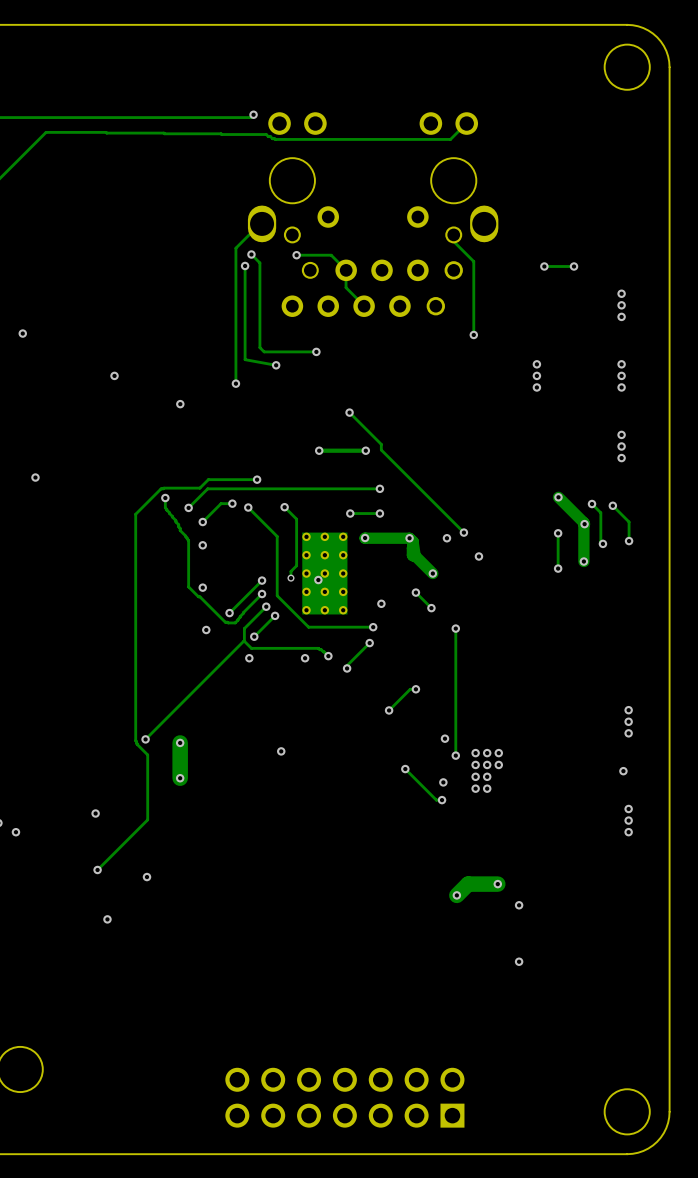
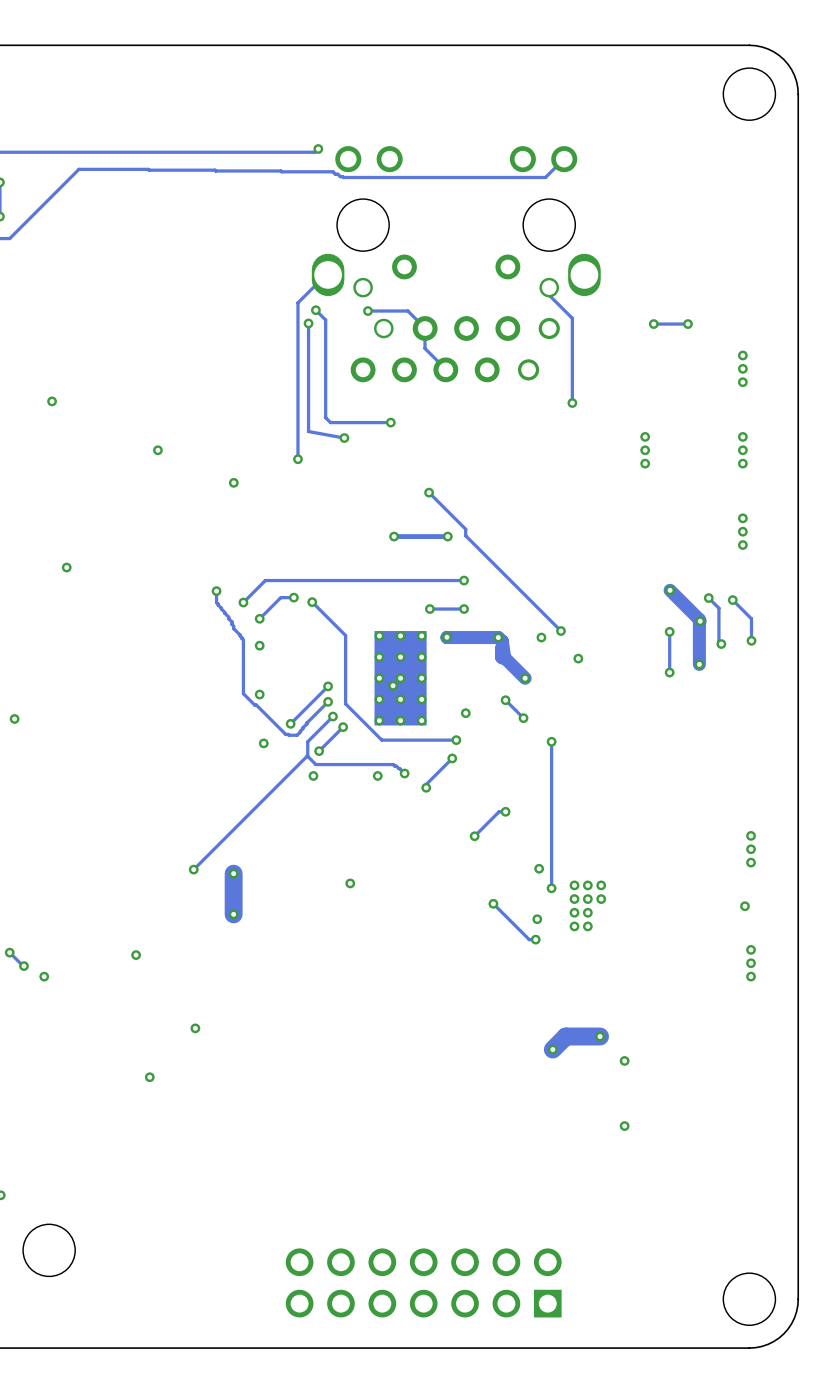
track: (257, 479) (208, 479) (199, 488) (161, 488) (135, 514) (135, 740) (147, 754) (147, 819) (97, 869) -> none
via: (257, 479) -> none
track: (284, 507) (296, 519) (296, 565) (290, 571) (290, 577) -> none
via: (284, 507) -> none
via: (290, 578) -> none
via: (97, 869) -> none

